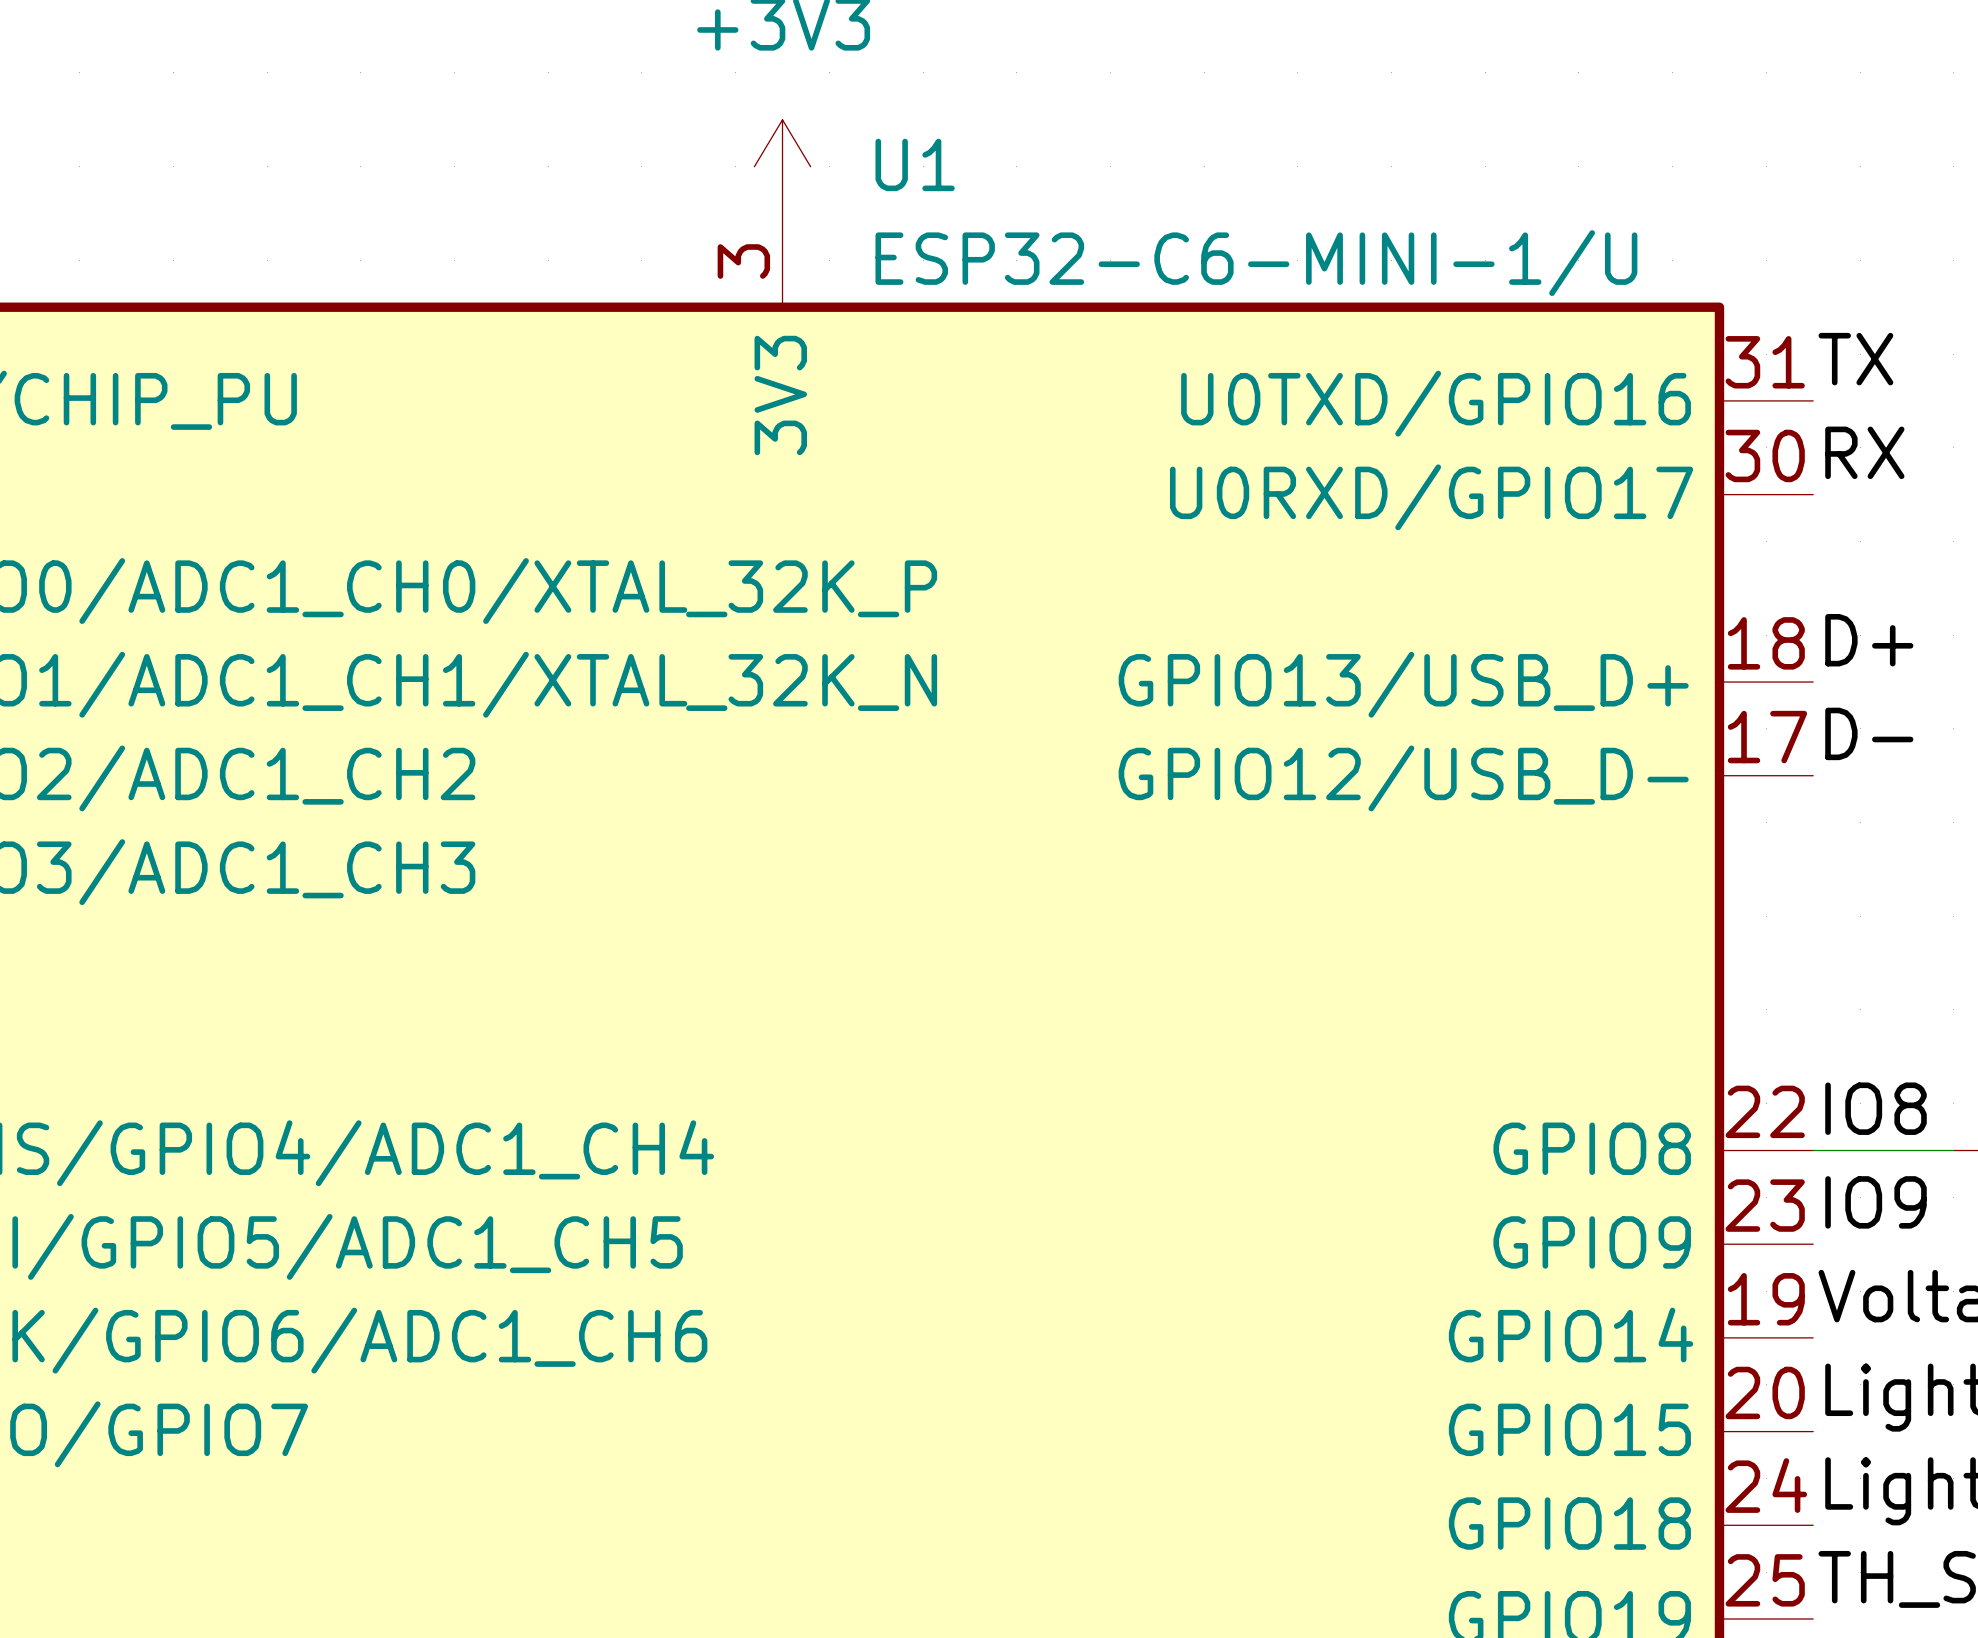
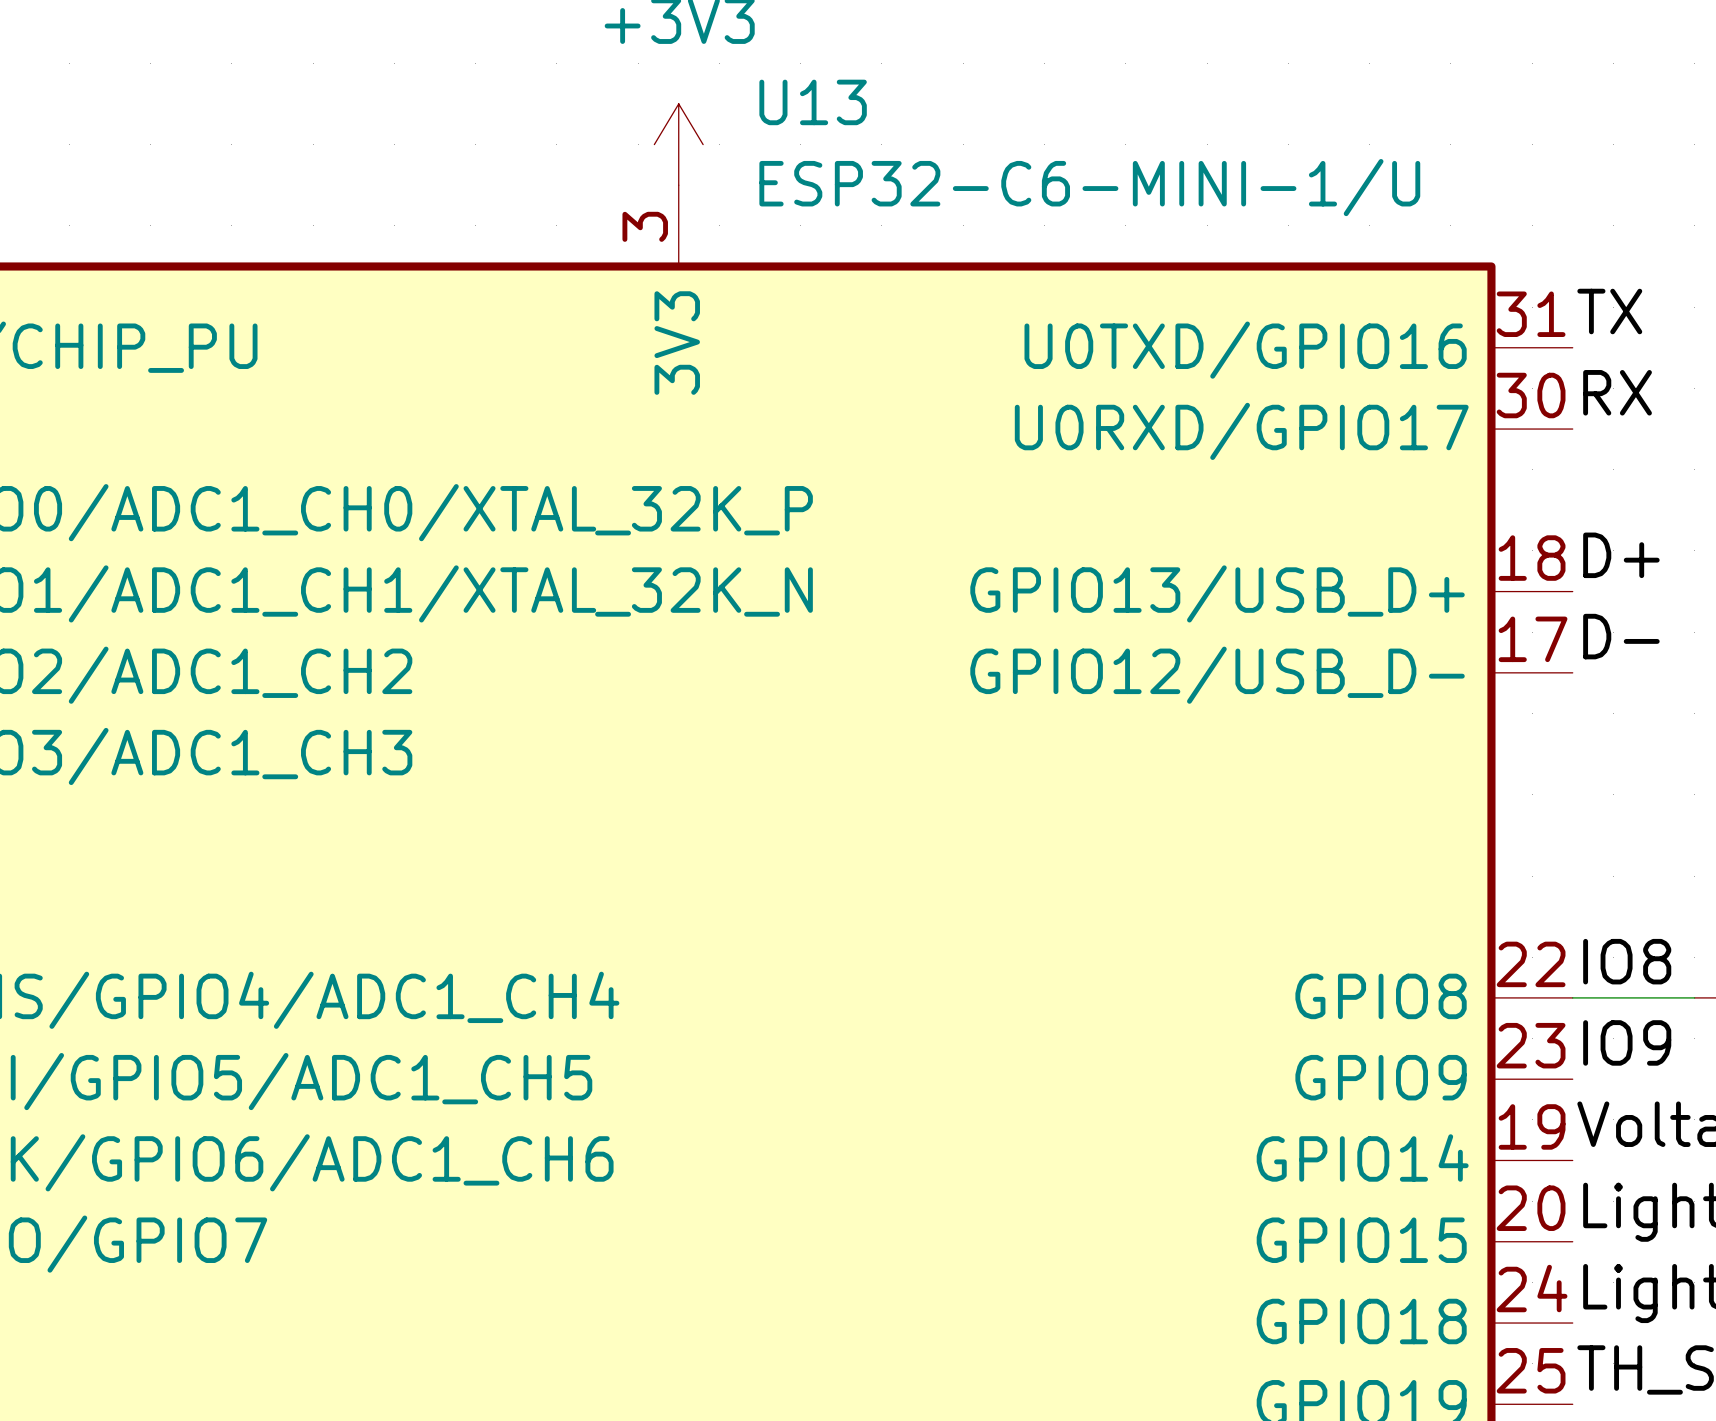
U1 name: U1 (915, 164) -> U13 (813, 102)
U1 value position: ESP32-C6-MINI-1/U (1256, 263) -> ESP32-C6-MINI-1/U (1089, 187)

